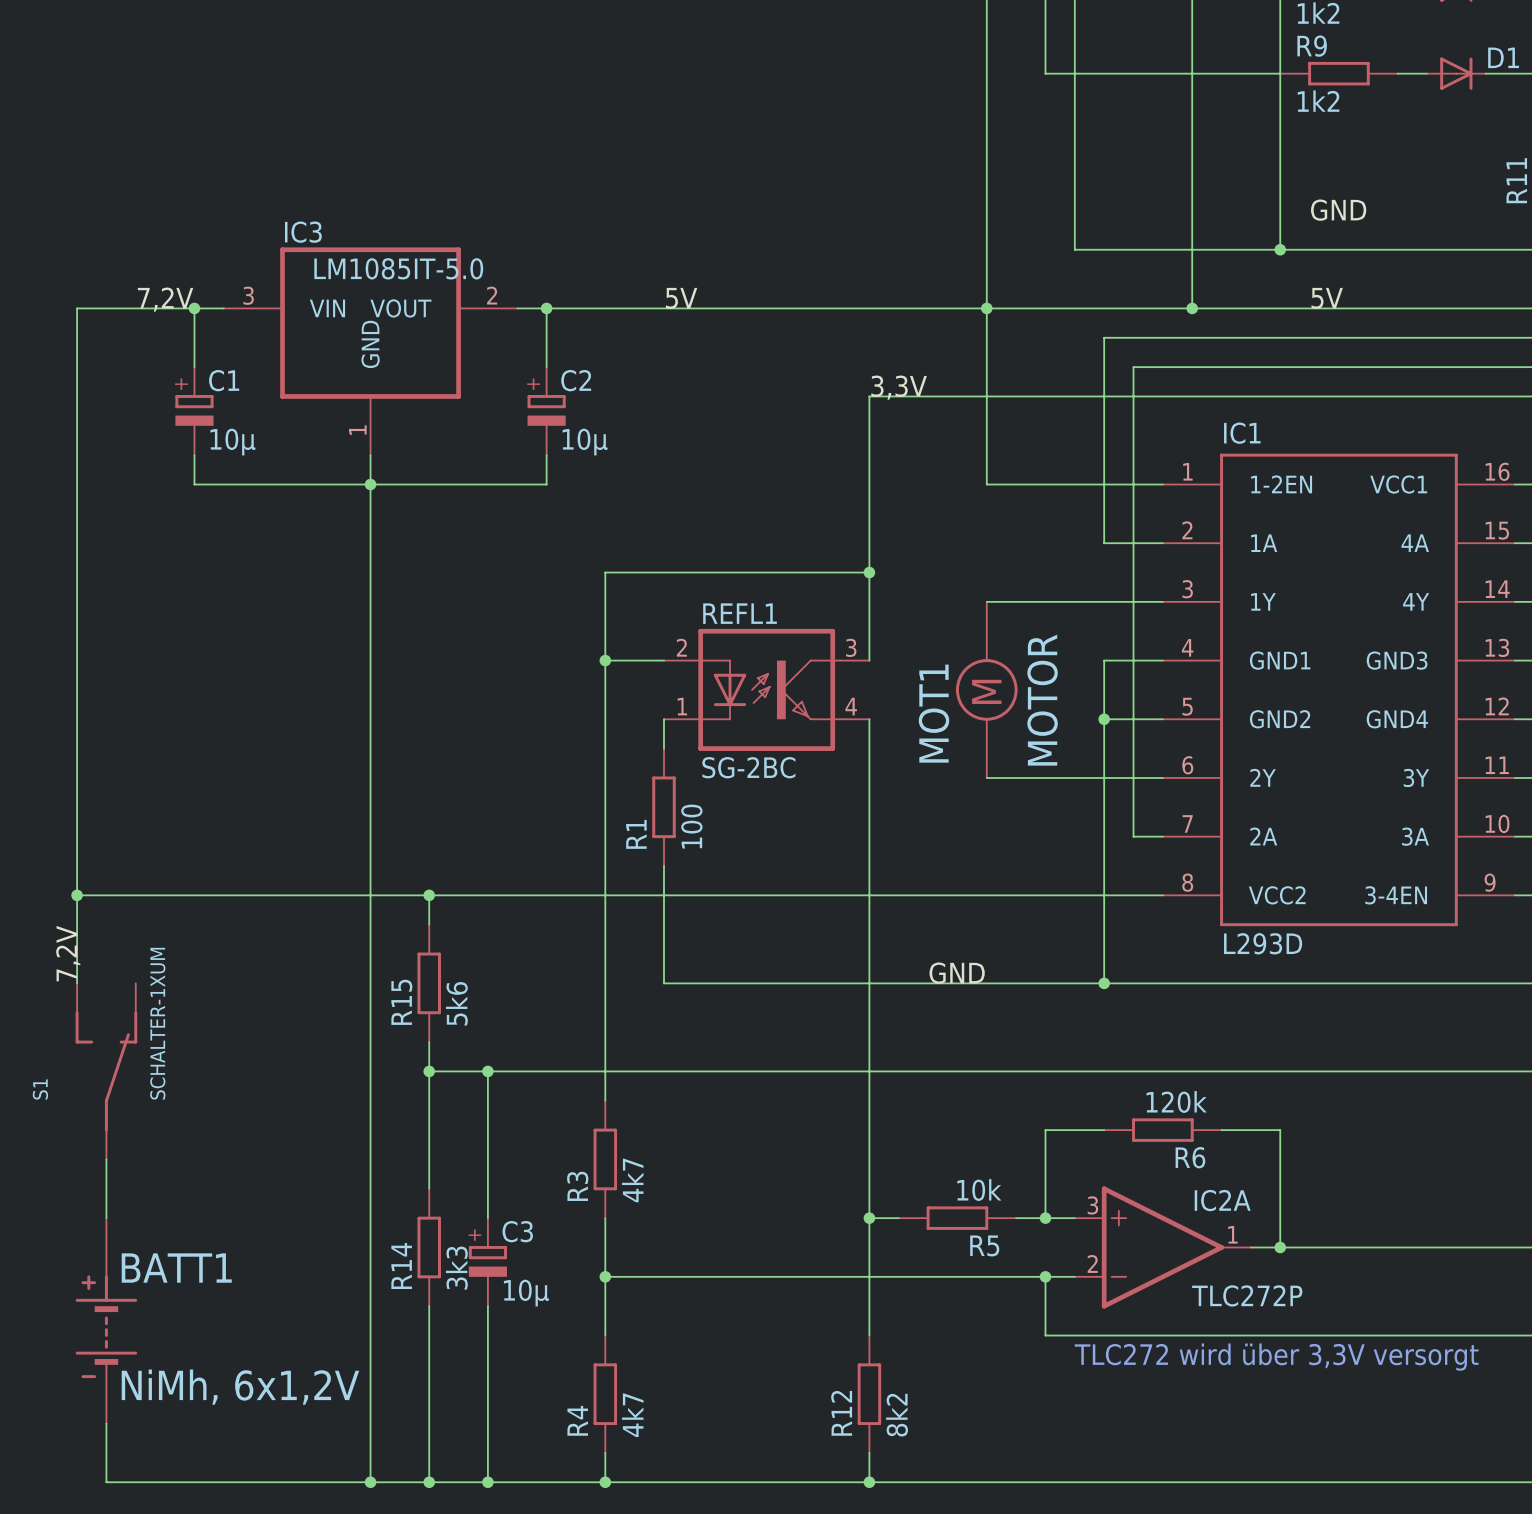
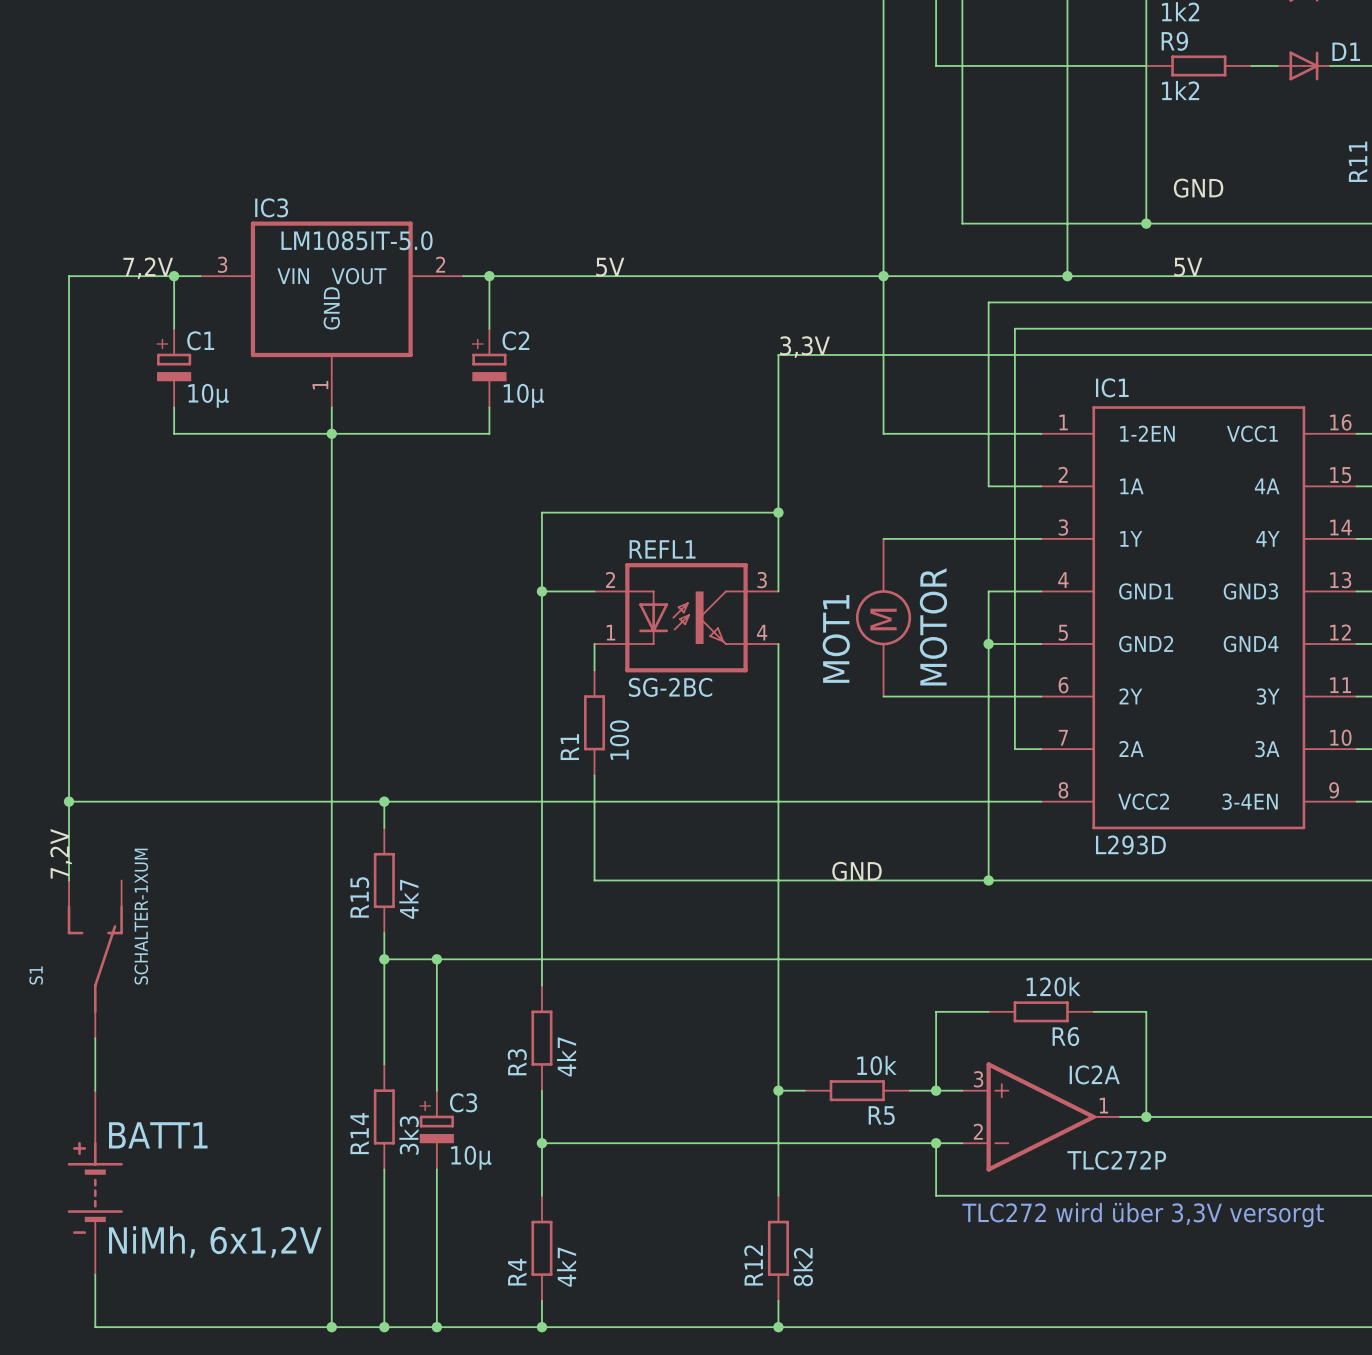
R15 value: 5k6 (456, 1003) -> 4k7 (408, 899)

